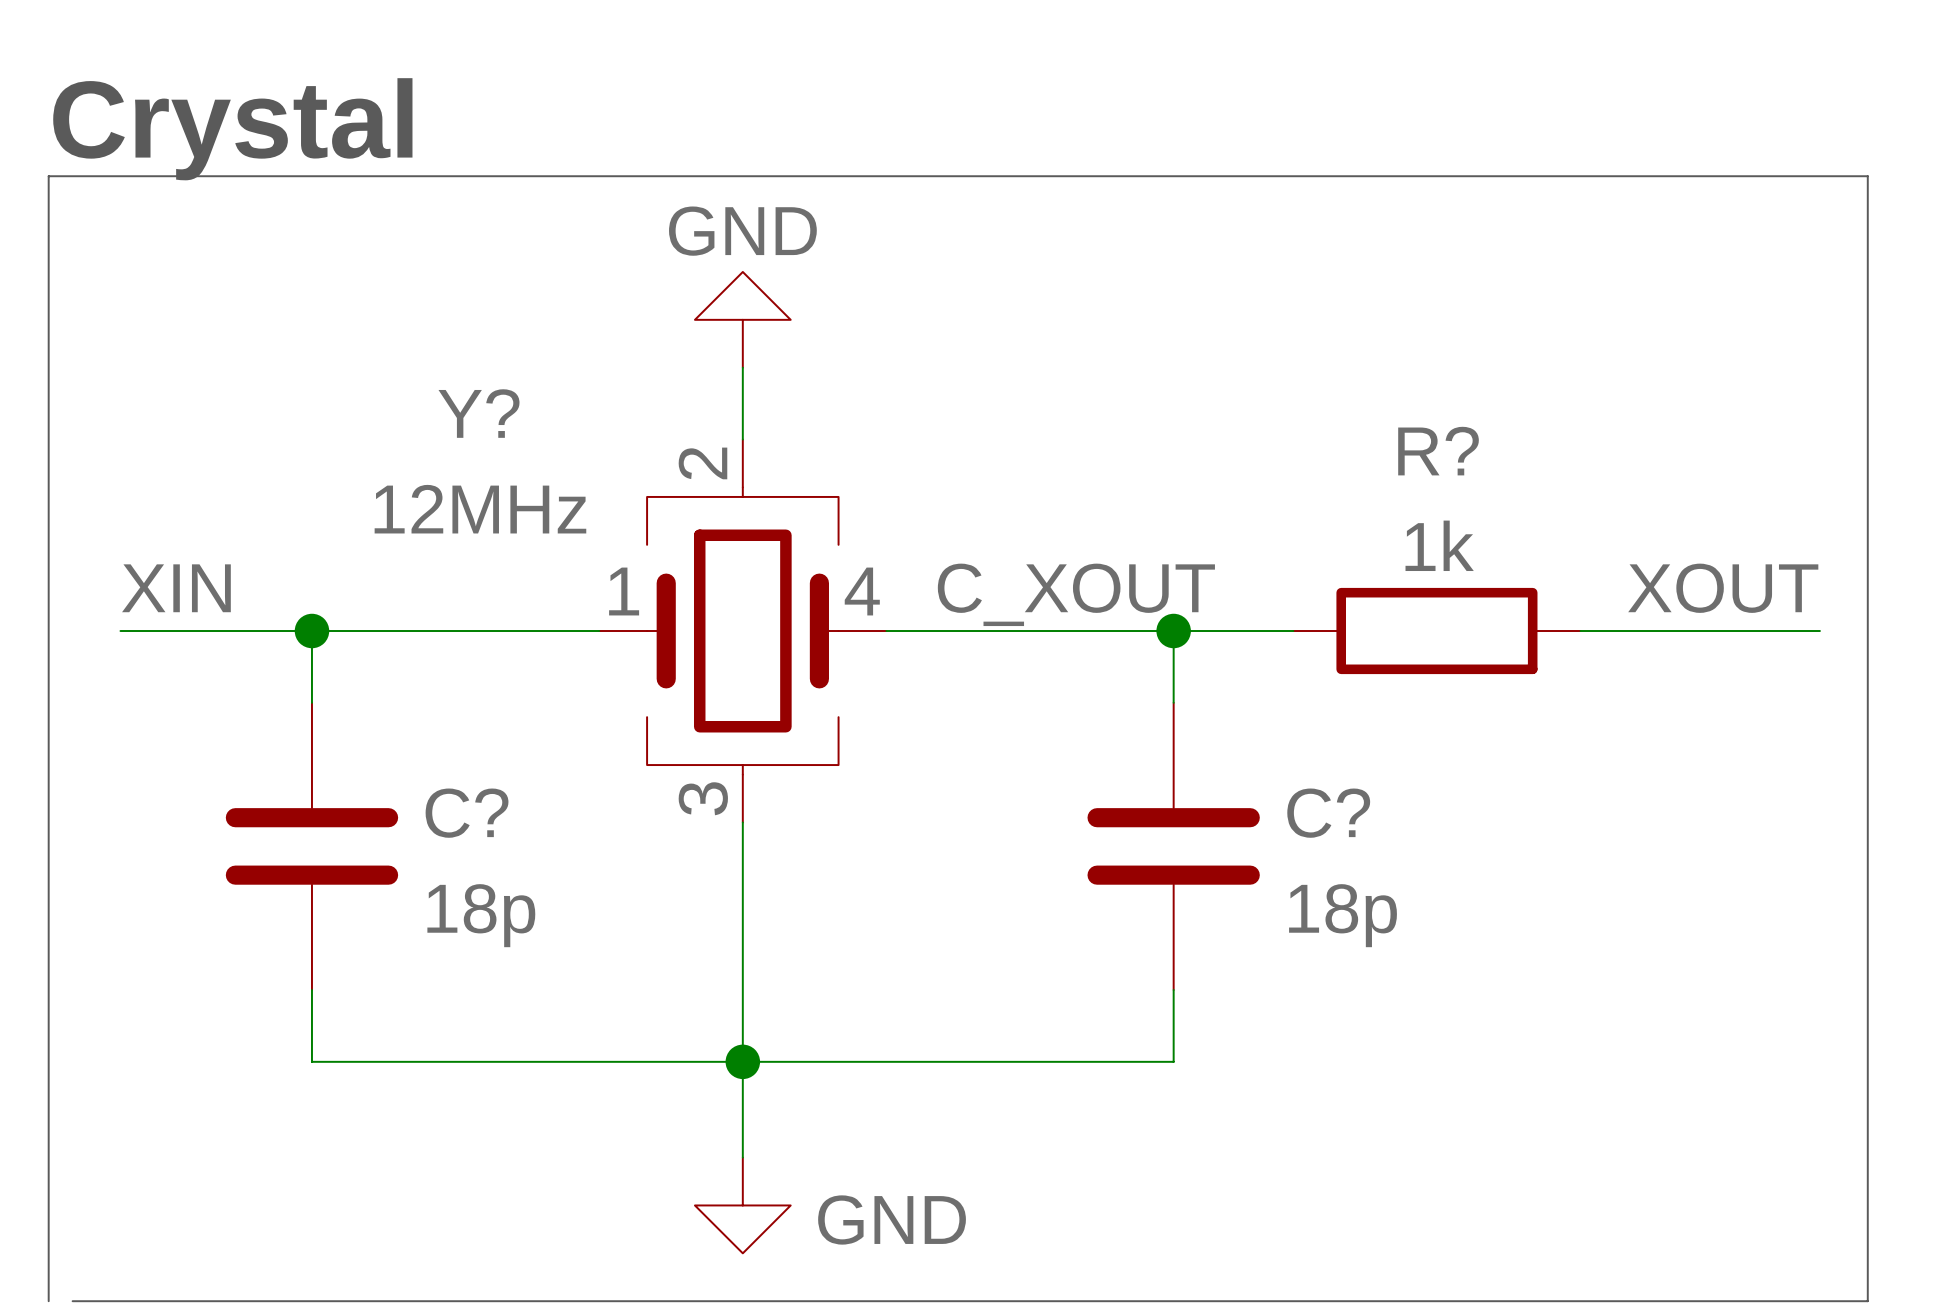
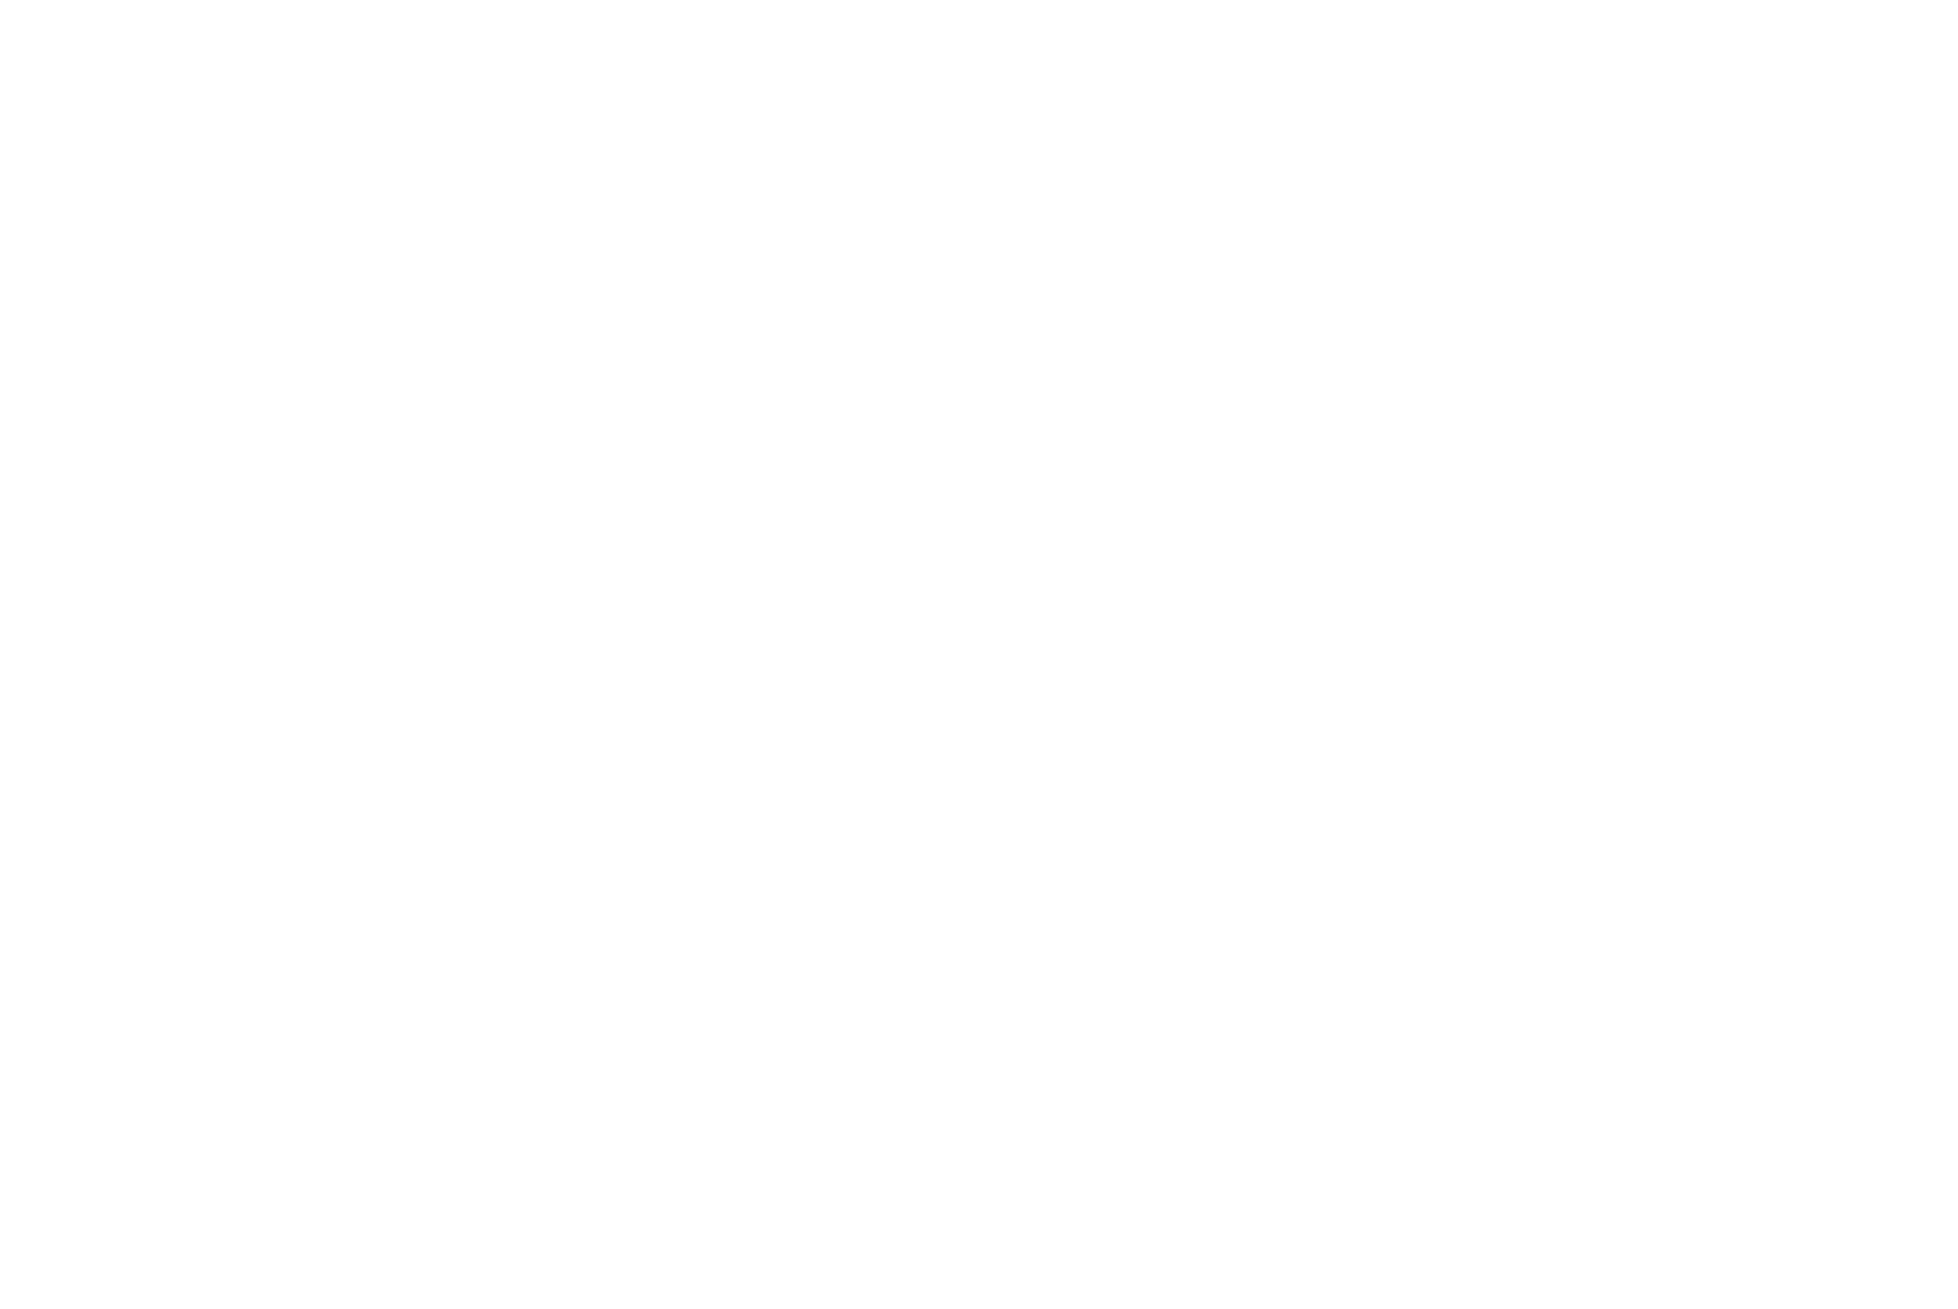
text: Crystal (232, 129) -> none
power symbol: GND (742, 319) -> none
wire: (742, 367) (742, 439) -> none
label: XIN (176, 588) -> none
label: XOUT (1723, 588) -> none
label: C_XOUT (1076, 594) -> none
wire: (120, 631) (599, 631) -> none
wire: (311, 631) (311, 702) -> none
junction: (311, 631) -> none
Y?: 12MHz (742, 631) -> none
wire: (886, 631) (1293, 631) -> none
wire: (1173, 631) (1173, 702) -> none
junction: (1173, 631) -> none
R?: 1k (1436, 631) -> none
wire: (1580, 631) (1819, 631) -> none
wire: (742, 822) (742, 1157) -> none
C?: 18p (311, 846) -> none
C?: 18p (1173, 846) -> none
wire: (311, 990) (311, 1061) (1173, 1061) (1173, 990) -> none
junction: (742, 1061) -> none
power symbol: GND (742, 1205) -> none
line: (48, 1301) (48, 176) (1867, 176) (1867, 1301) (72, 1301) -> none

